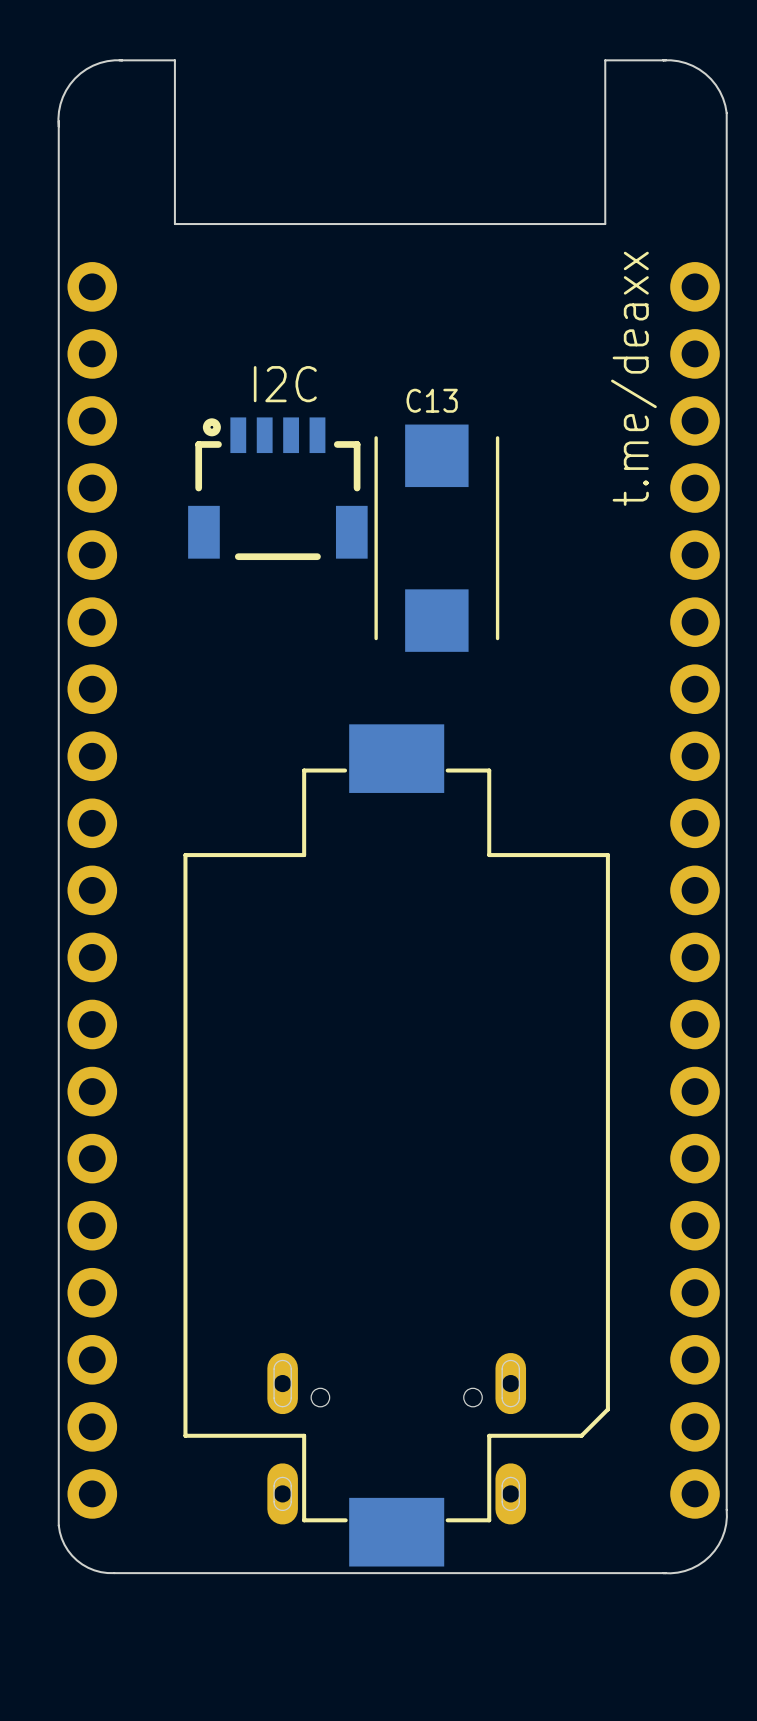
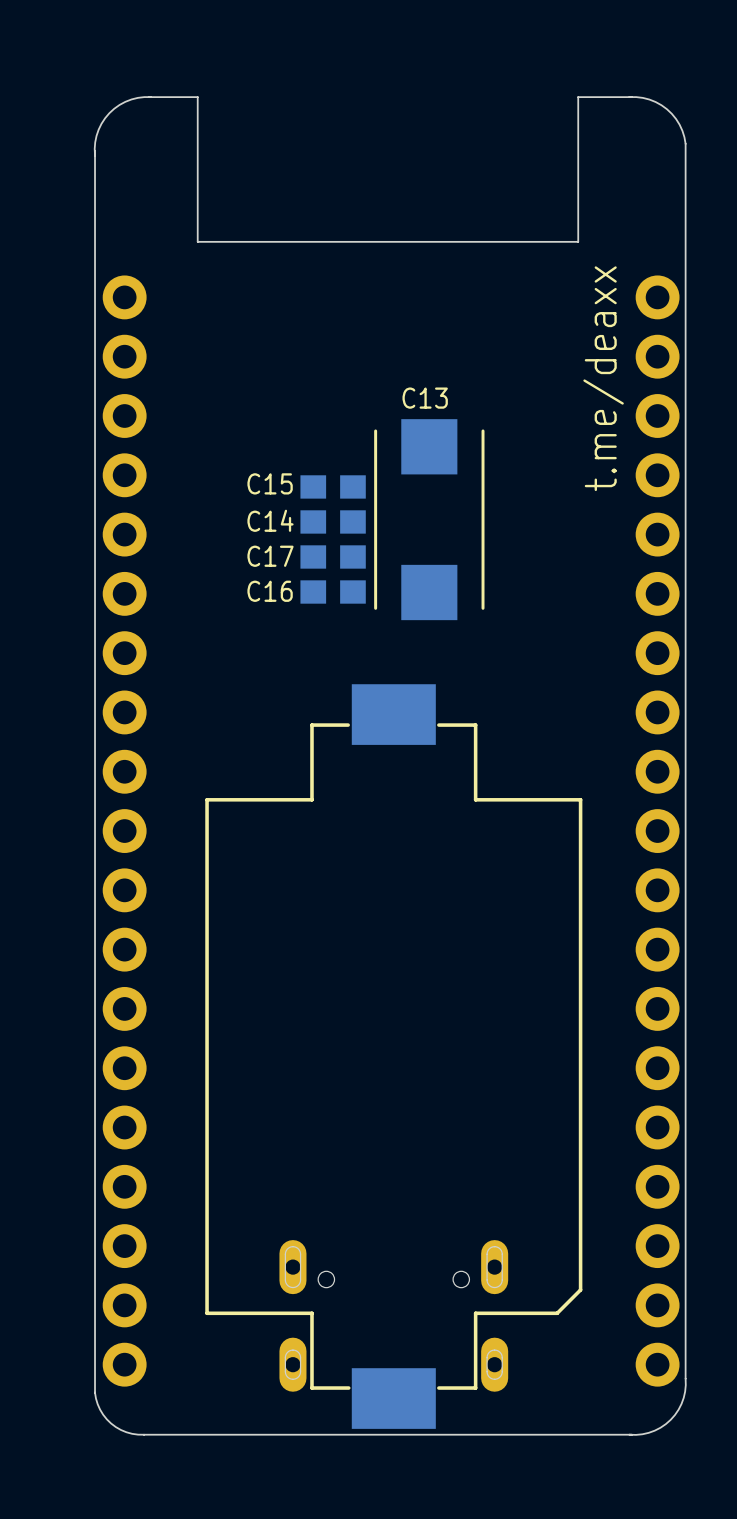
text: I2C (285, 384) -> none
part: (277, 488) -> none
C15: none -> (333, 486)
C14: none -> (333, 521)
C17: none -> (333, 556)
C16: none -> (333, 592)

